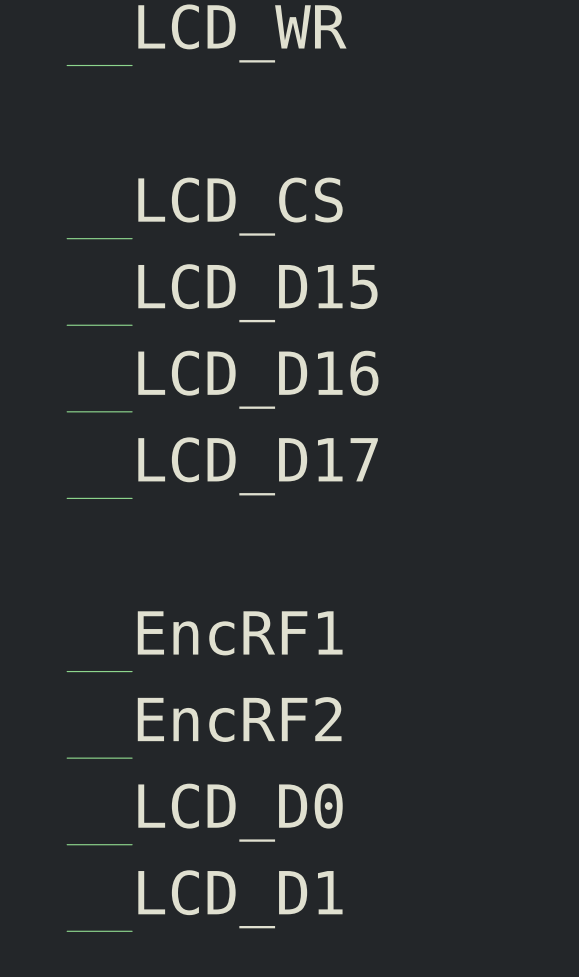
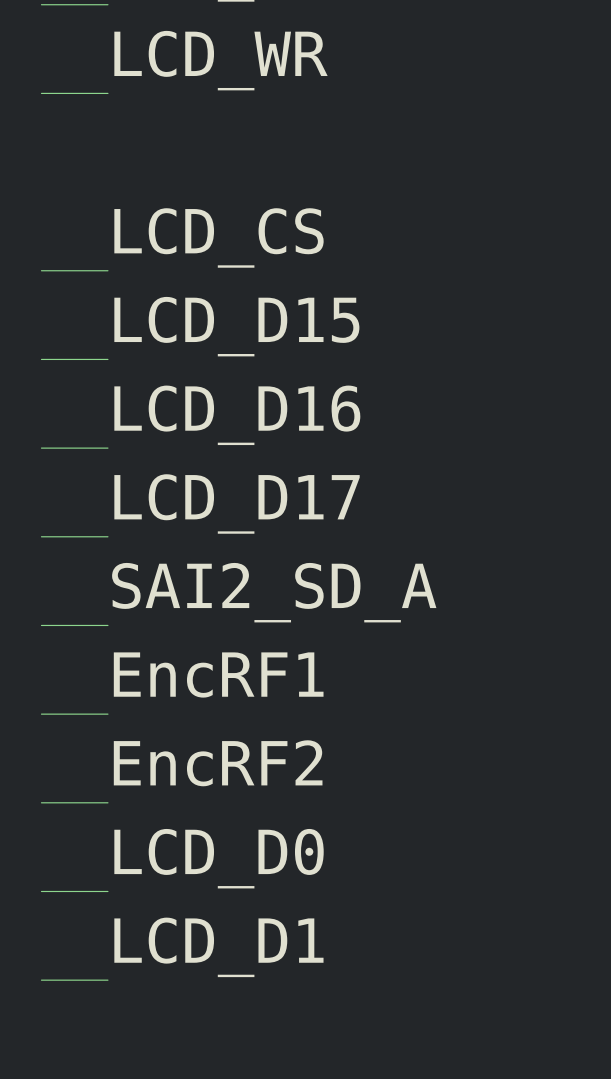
label: none -> SAI2_SD_A (274, 592)
wire: none -> (41, 625) (107, 625)

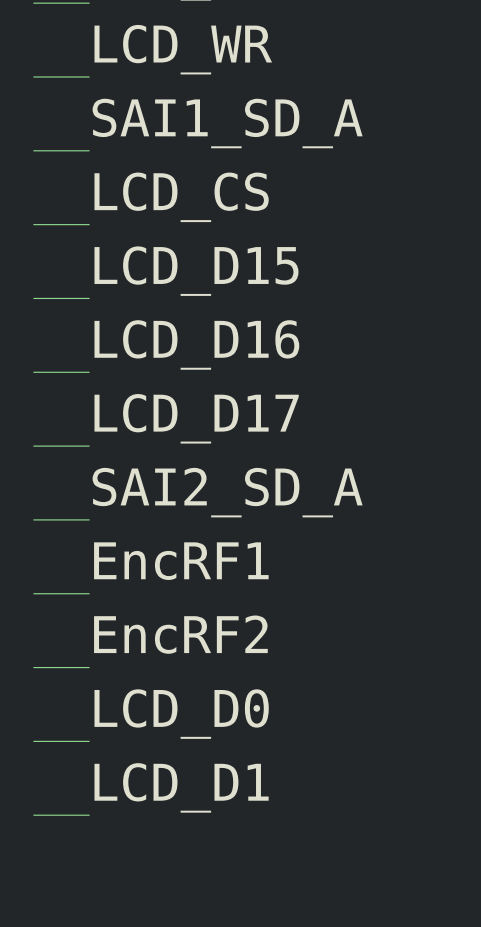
label: none -> SAI1_SD_A (227, 123)
wire: none -> (33, 150) (89, 150)

